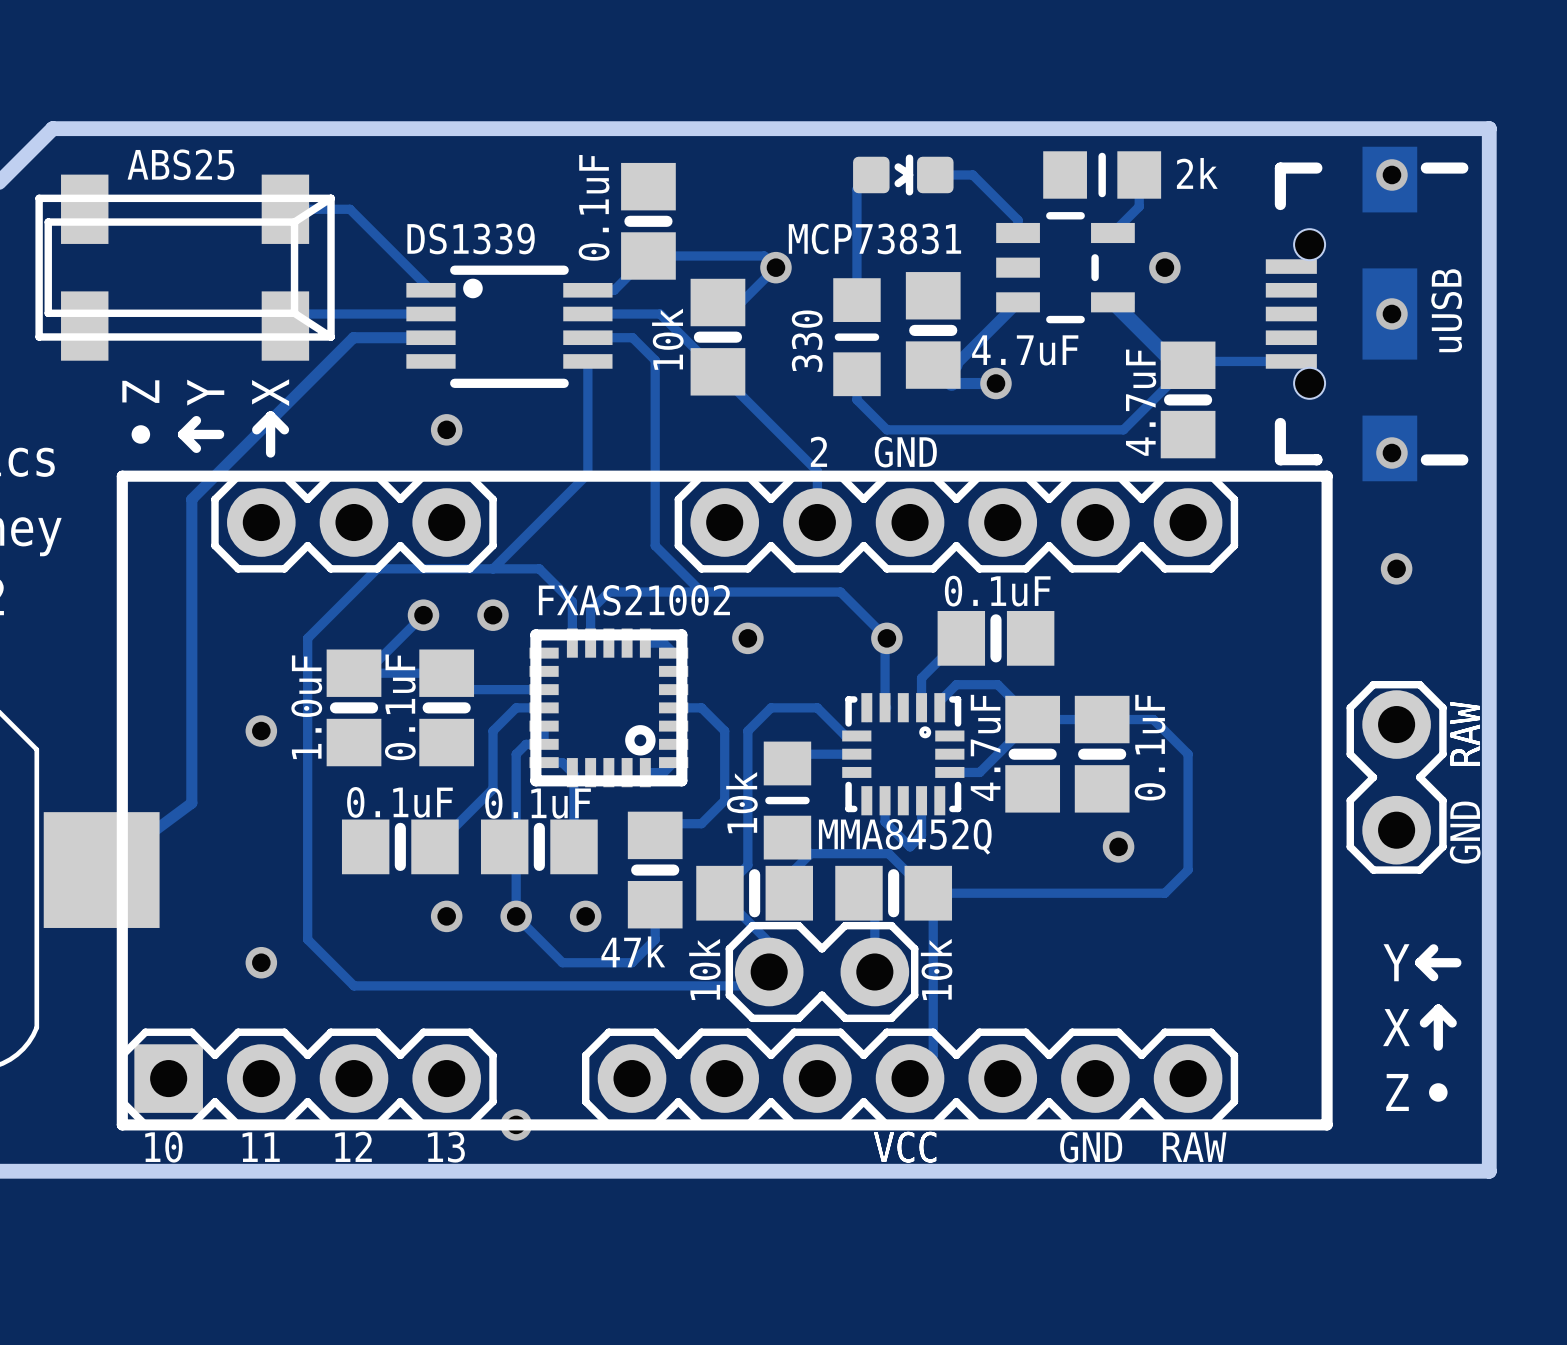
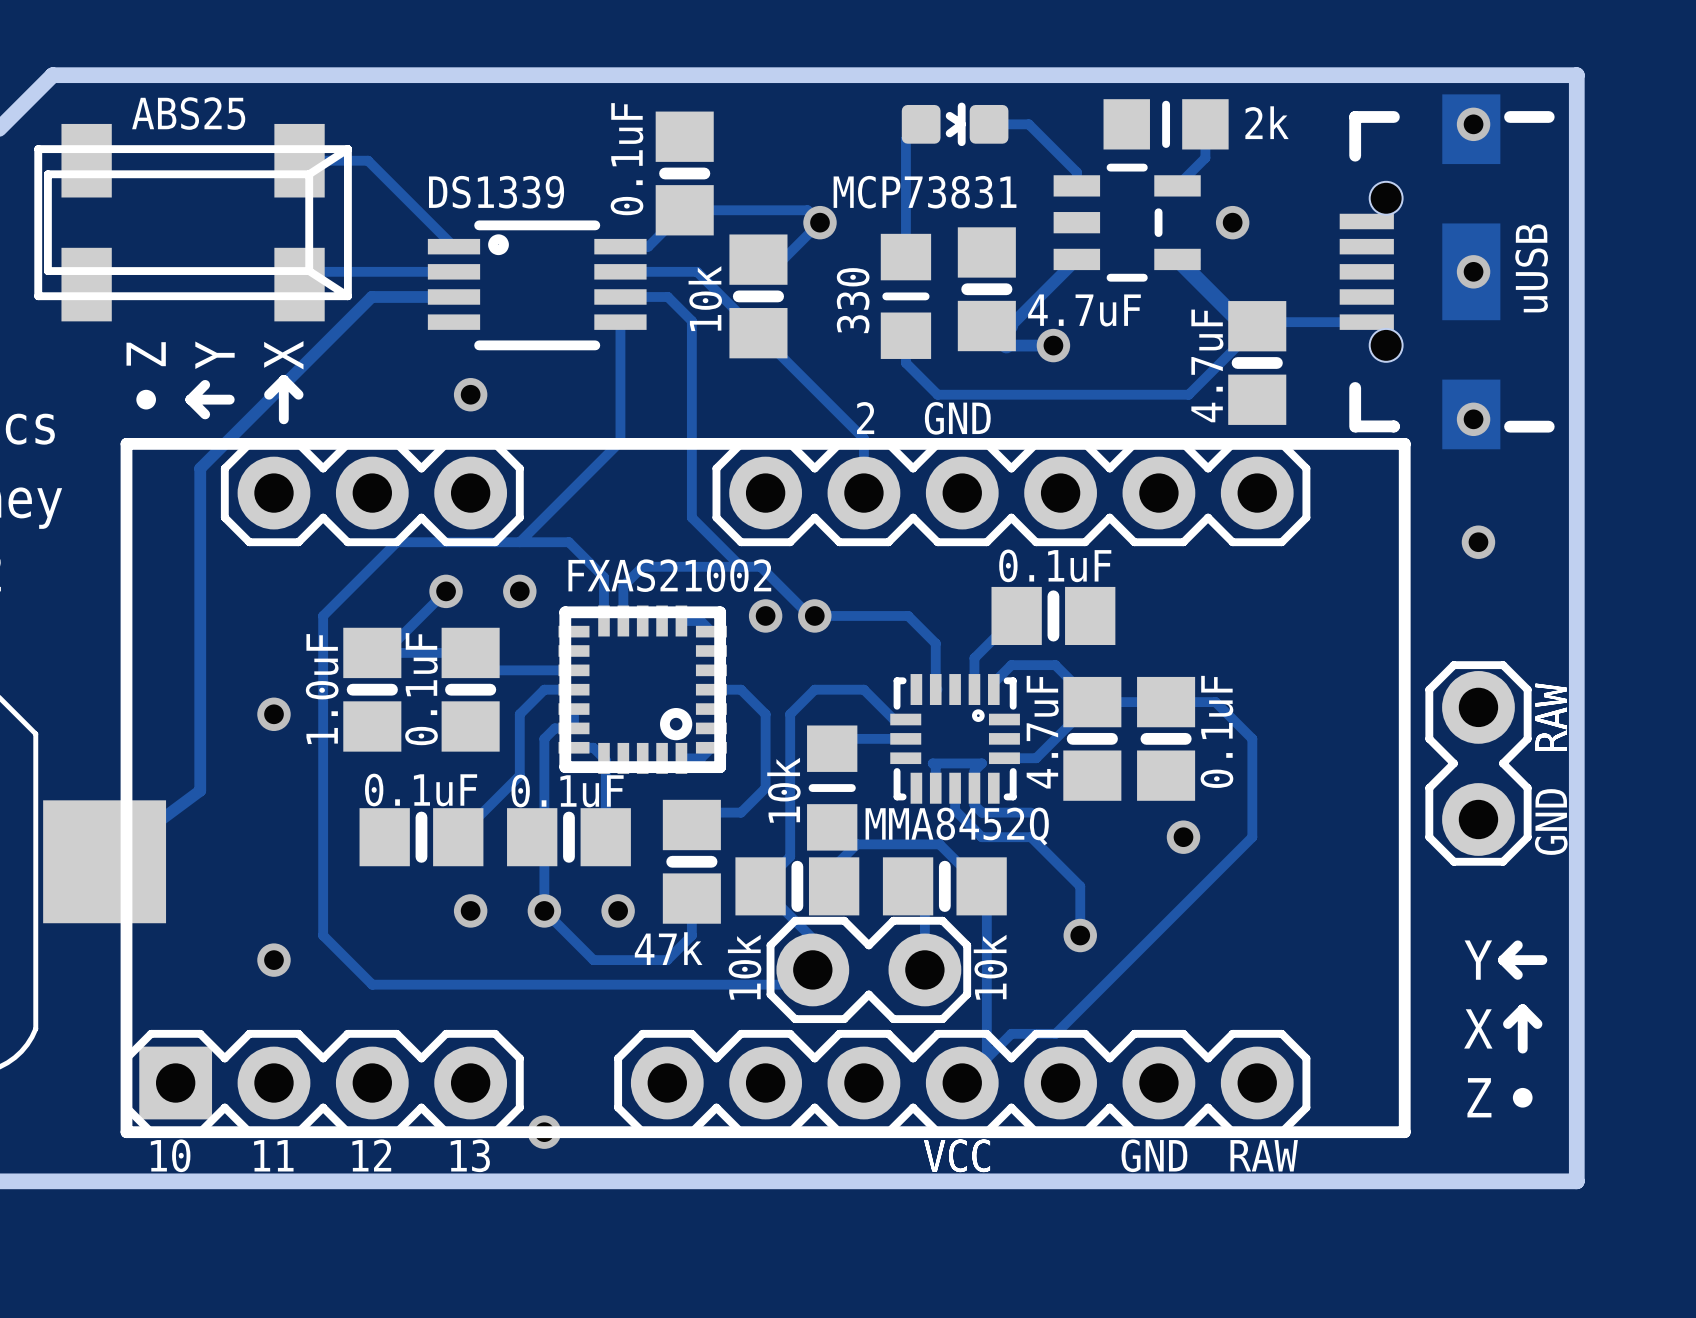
track: (720, 592) (840, 592) (886, 638) (885, 640) (885, 664) -> (760, 566) (809, 615) (908, 615) (935, 643)
via: none -> (765, 615)
via: (747, 638) -> none
via: none -> (814, 615)
via: (886, 638) -> none
track: (1148, 719) (1153, 719) (1188, 754) (1188, 870) (1164, 893) (928, 893) -> (1215, 702) (1252, 738) (1252, 837) (1055, 1033) (1011, 1033) (986, 1058)
track: (885, 800) (885, 821) (910, 846) (921, 835) (921, 816) -> (935, 788) (935, 766) (932, 763) (981, 763) (974, 770) (974, 788)
track: none -> (955, 788) (955, 810) (981, 837) (1031, 837) (1080, 886) (1080, 935)
track: none -> (974, 805) (981, 812) (1031, 812)
via: none -> (1080, 935)

